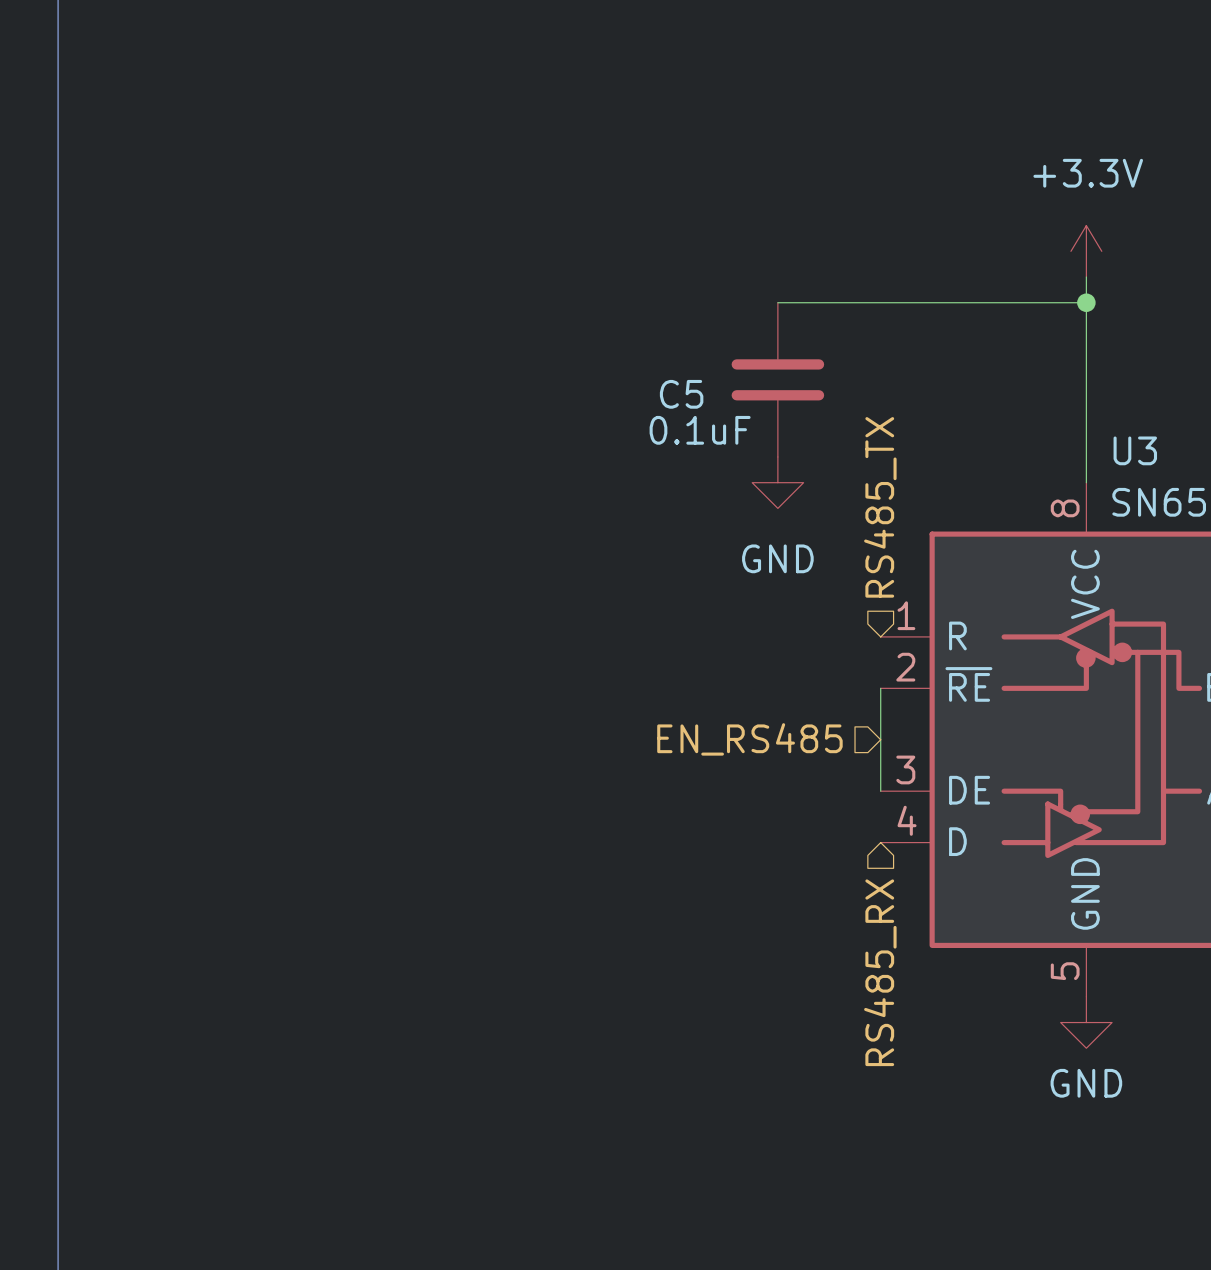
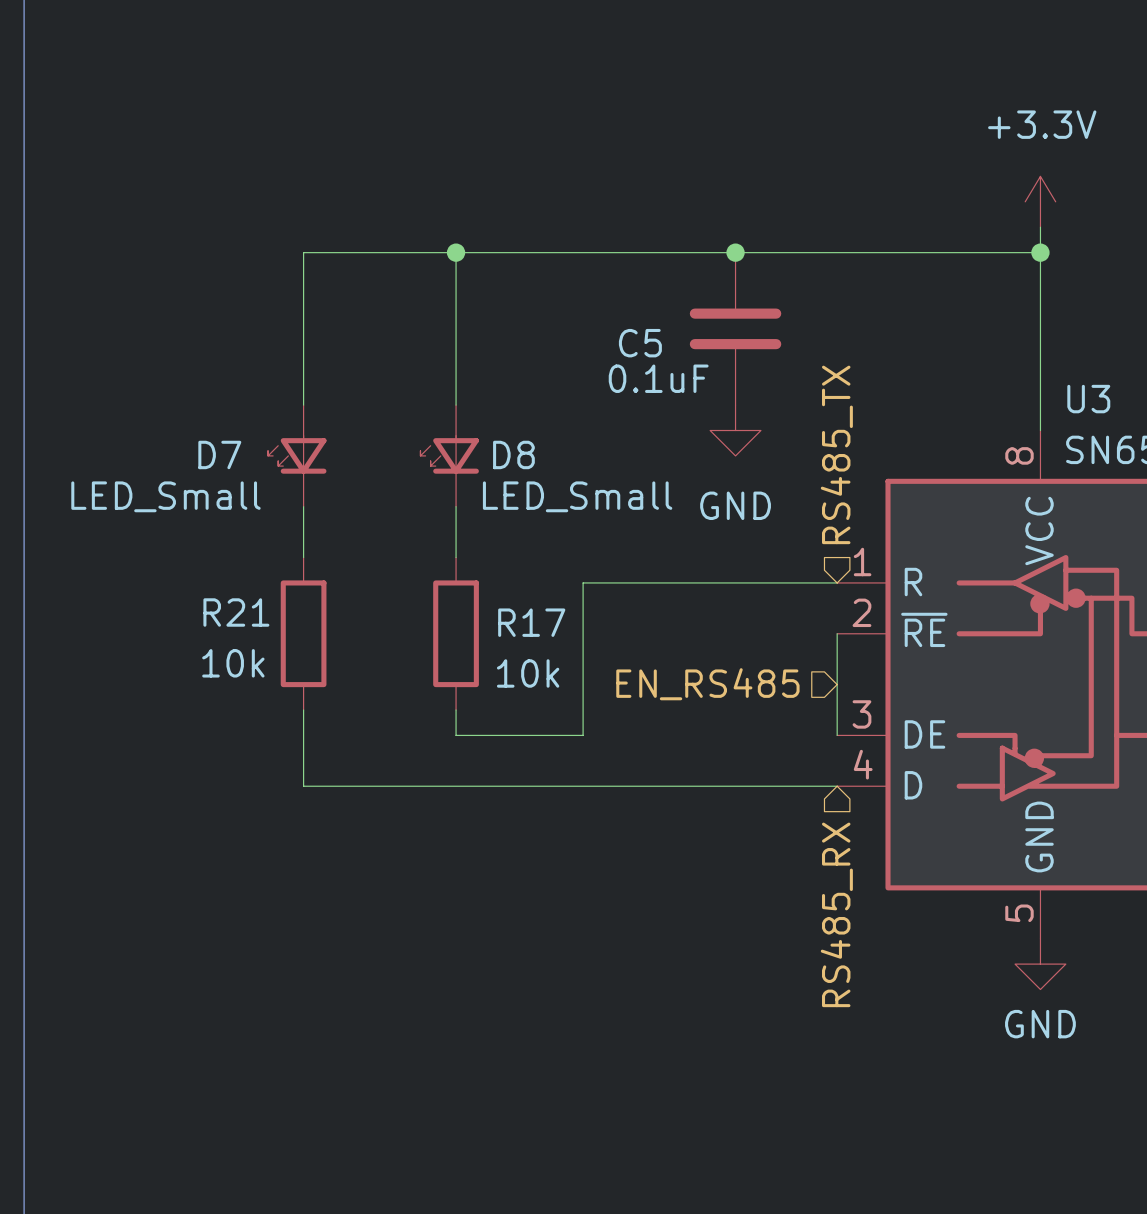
wire: none -> (456, 252) (456, 405)
junction: none -> (456, 252)
wire: none -> (735, 252) (303, 252) (303, 405)
junction: none -> (735, 252)
D7: none -> LED_Small (297, 455)
D8: none -> LED_Small (449, 455)
wire: none -> (303, 506) (303, 557)
wire: none -> (456, 506) (456, 557)
wire: none -> (837, 582) (583, 582) (583, 735) (456, 735) (456, 710)
R21: none -> 10k (303, 633)
R17: none -> 10k (456, 633)
wire: none -> (303, 710) (303, 786) (837, 786)

